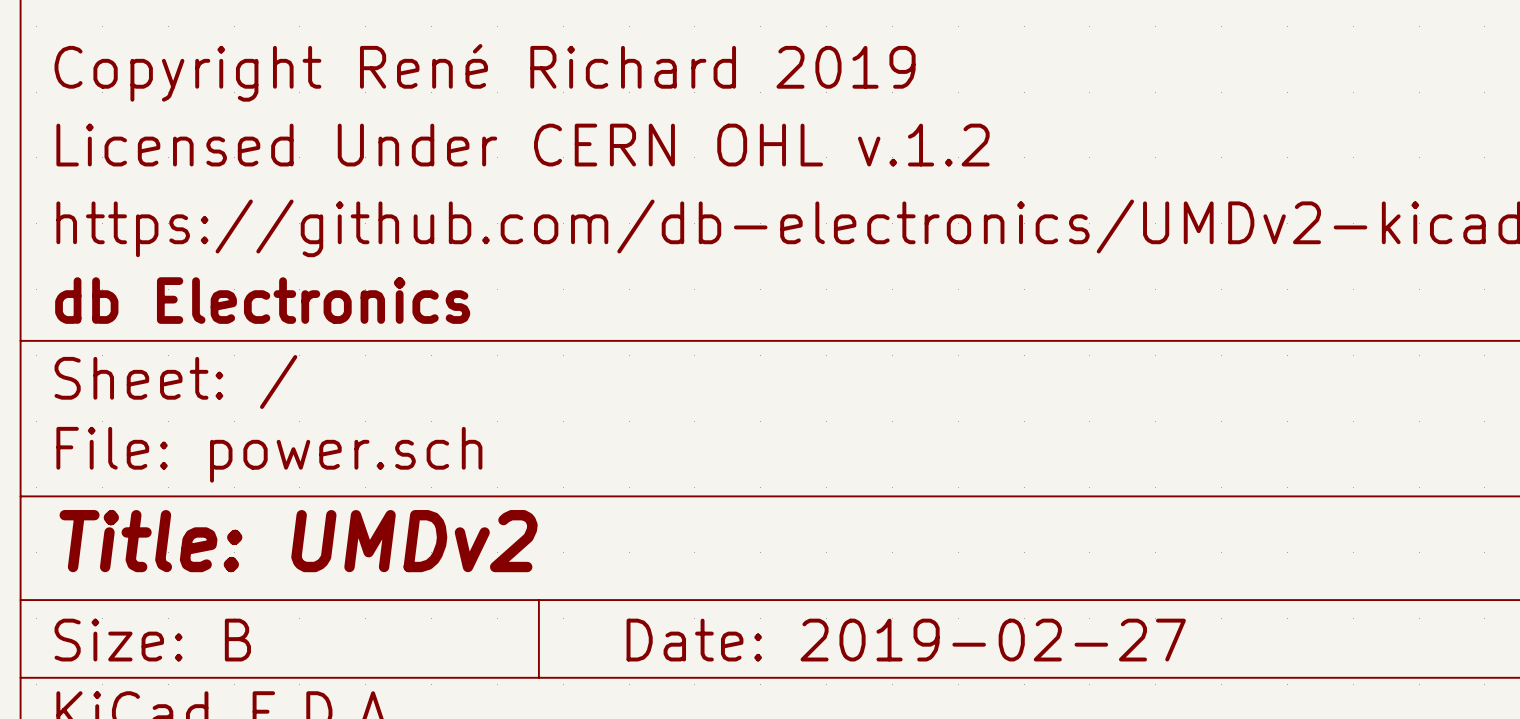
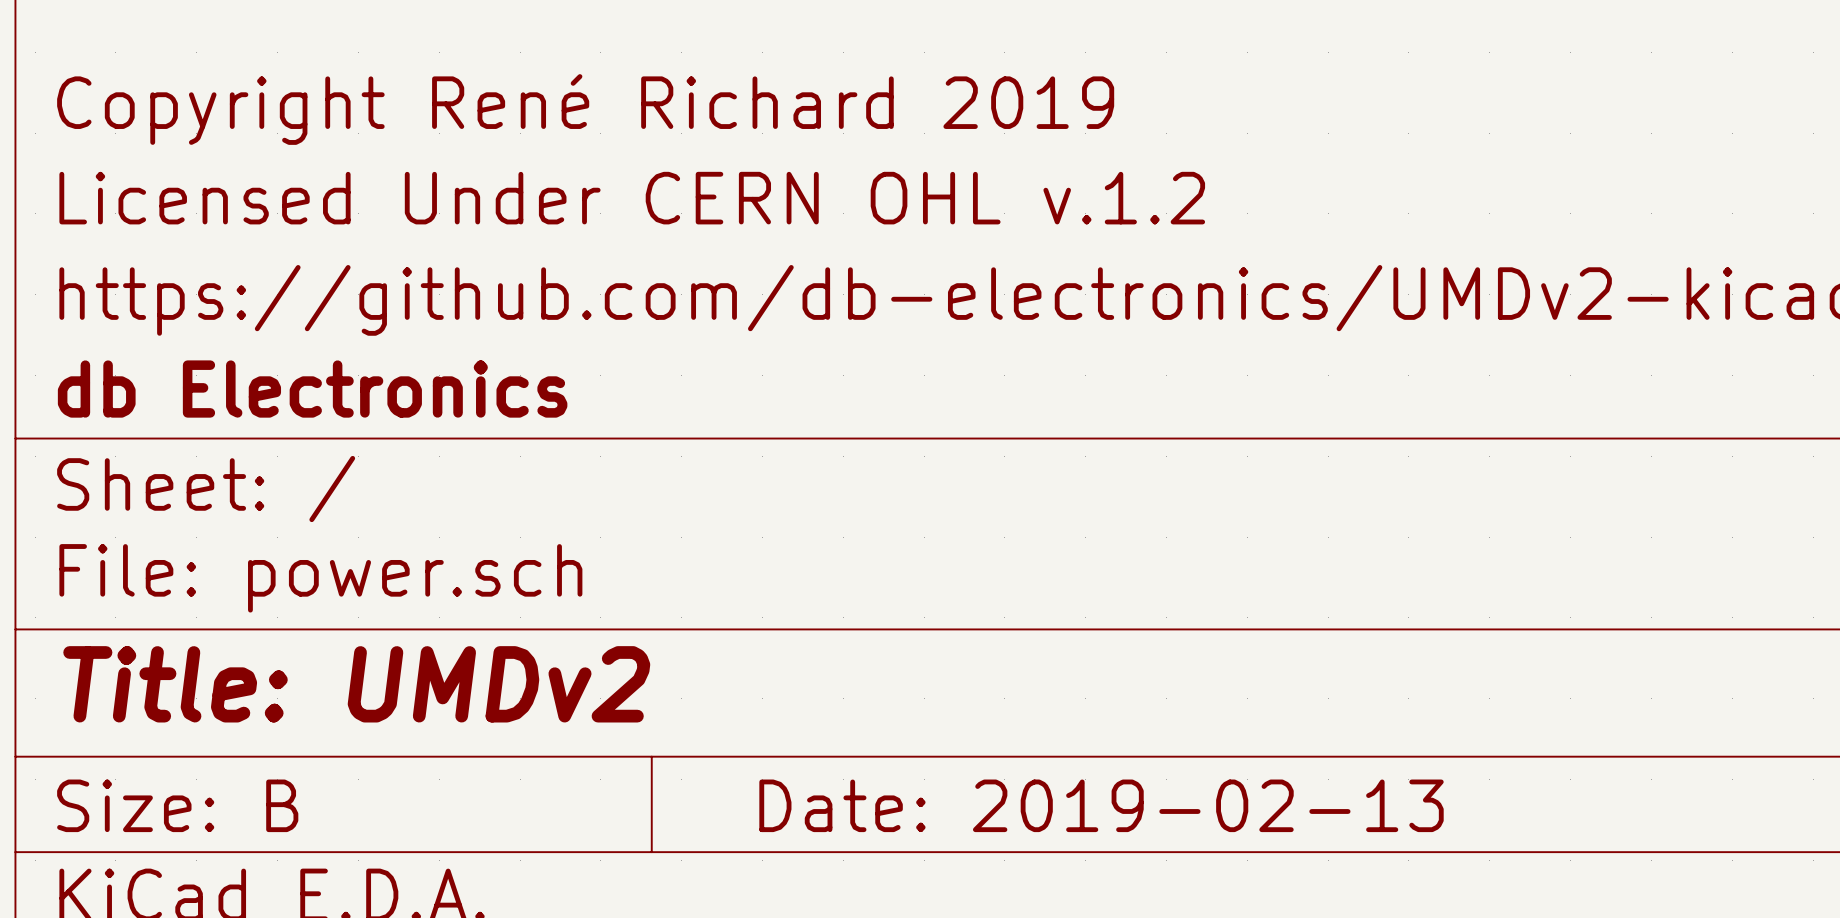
title block: Date: 2019-02-27 (906, 640) -> Date: 2019-02-13 (1101, 805)

